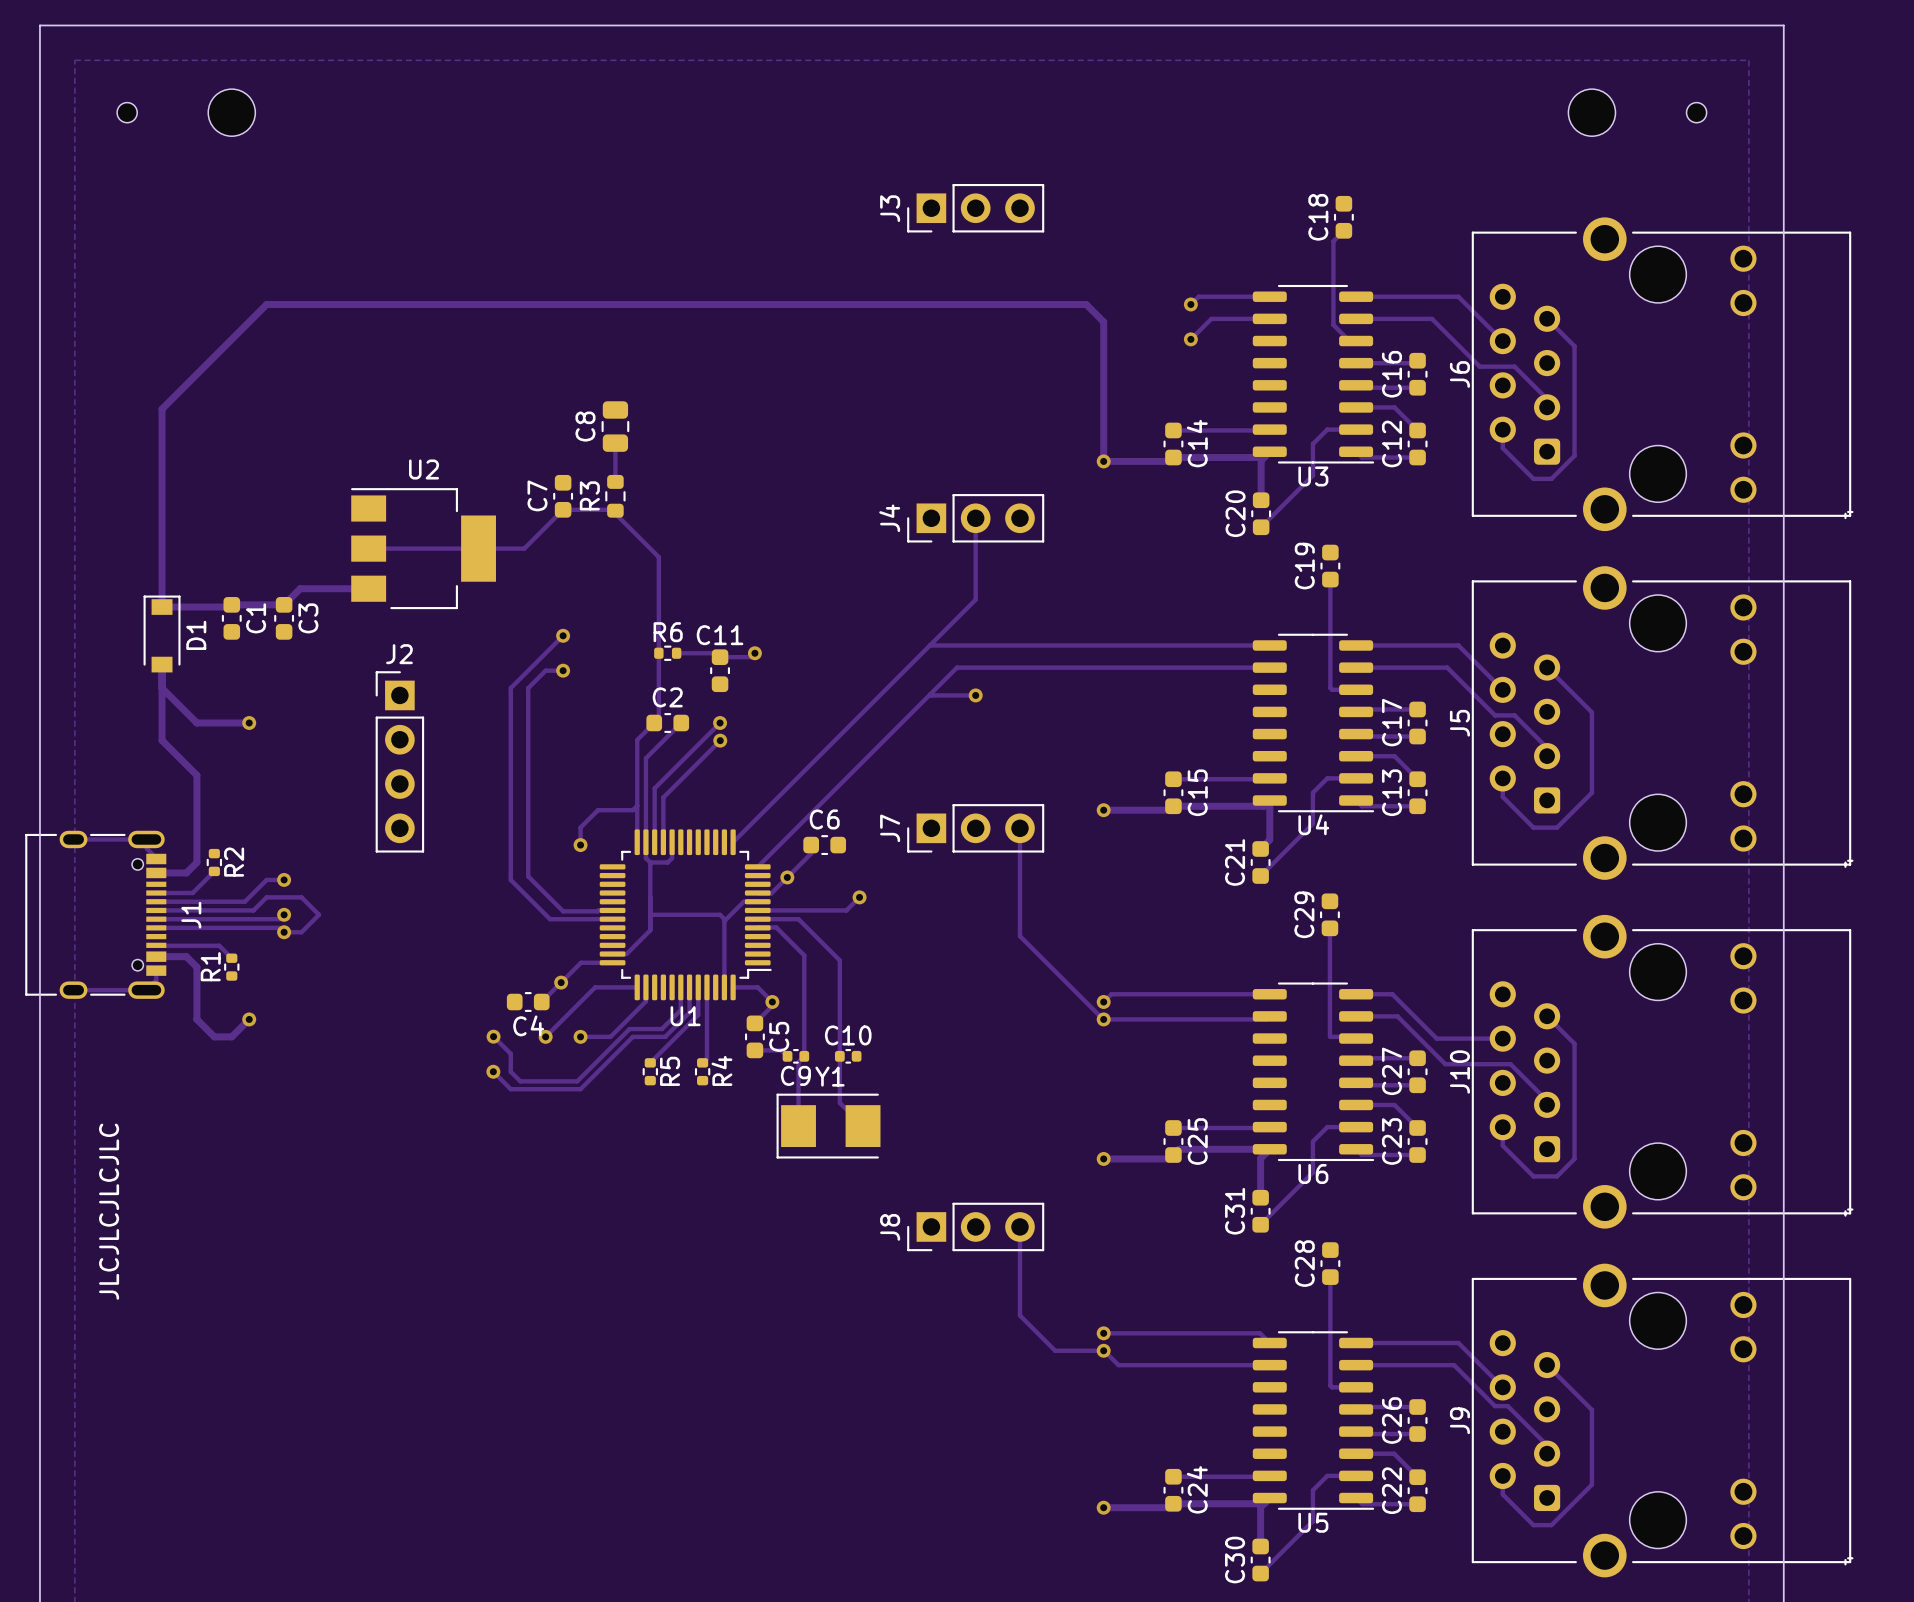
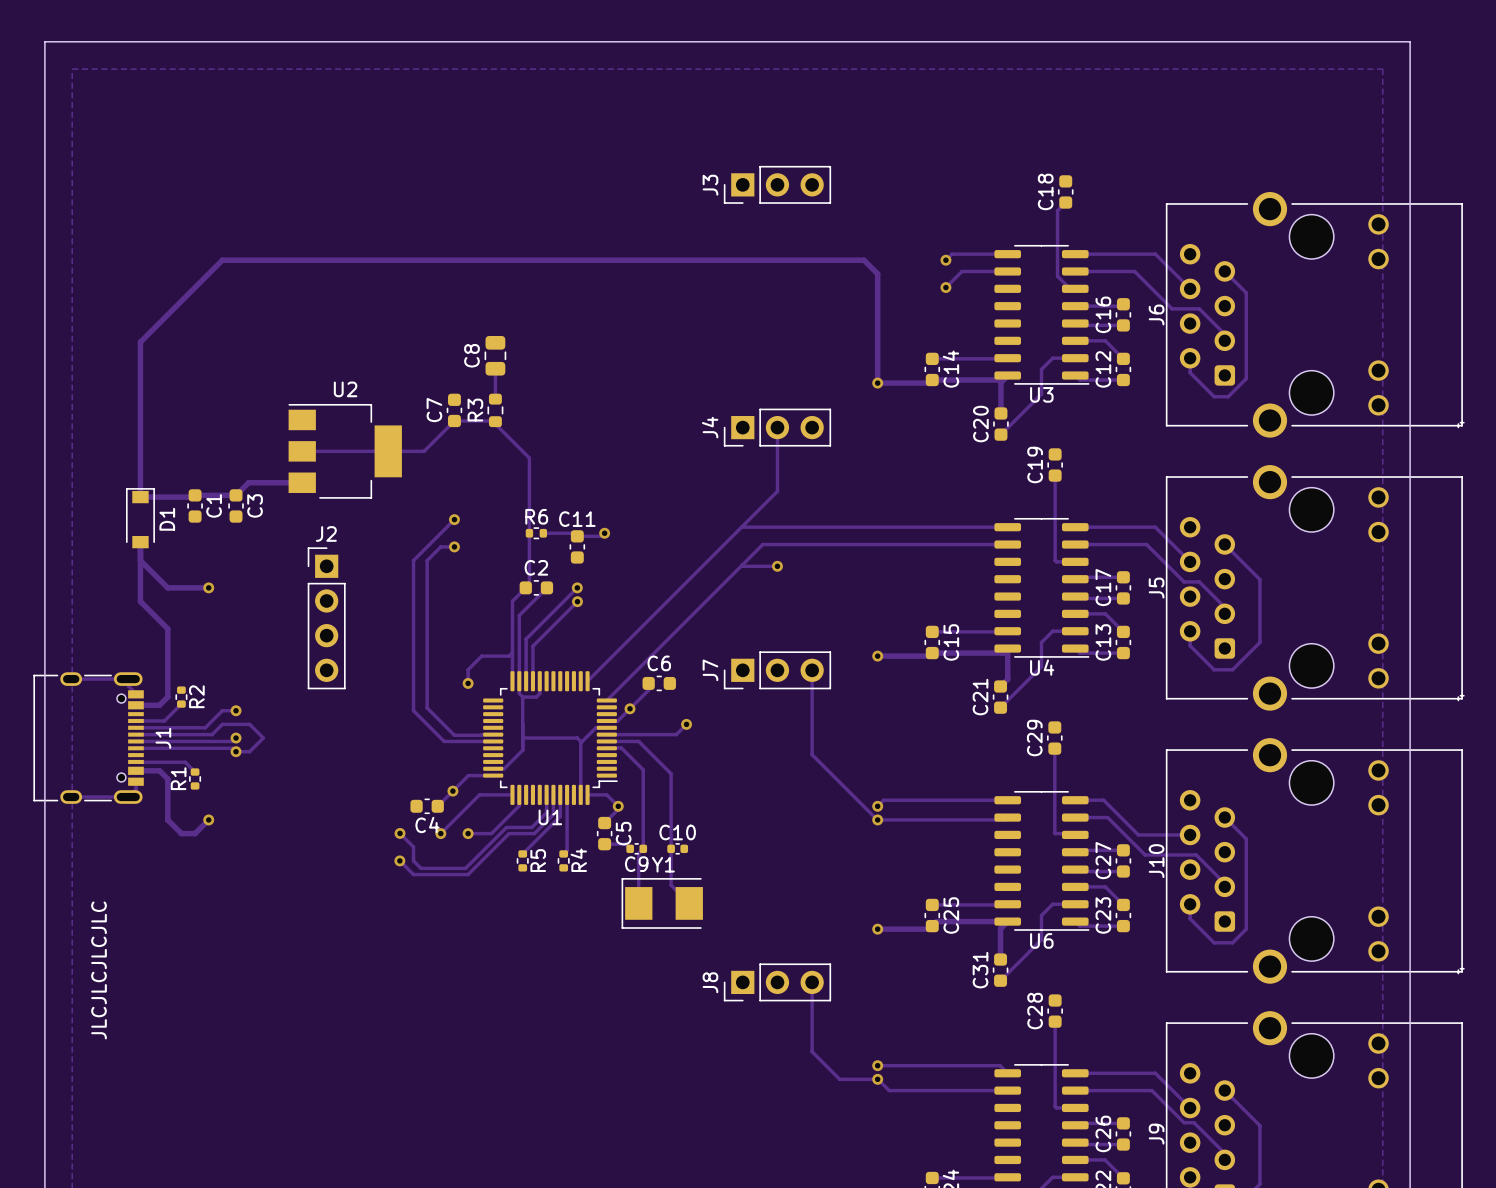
part: (127, 112) -> none
part: (231, 112) -> none
part: (1591, 112) -> none
part: (1696, 112) -> none

